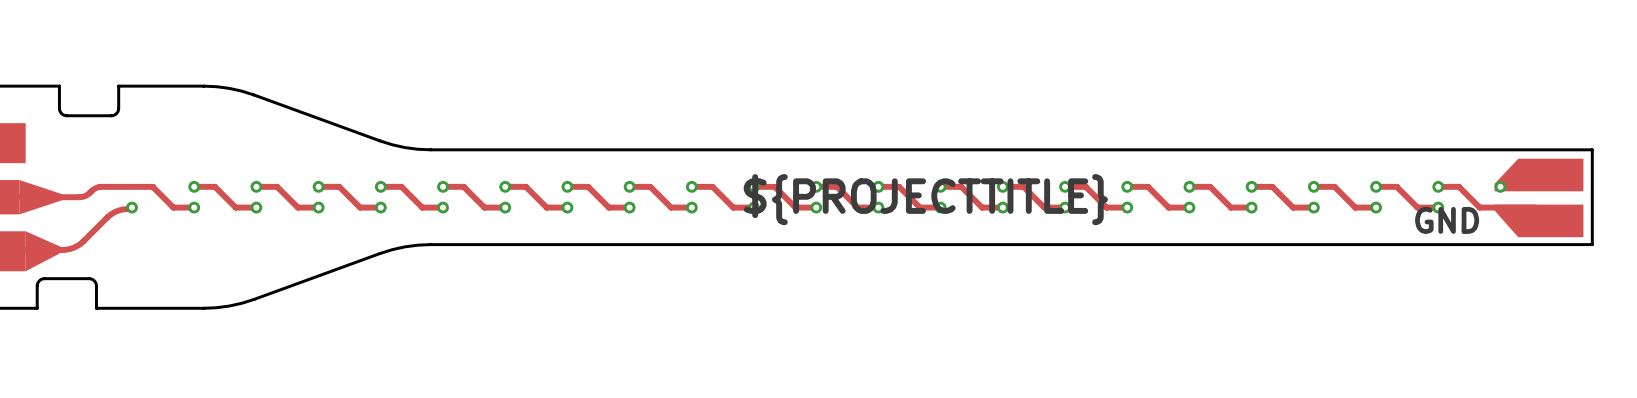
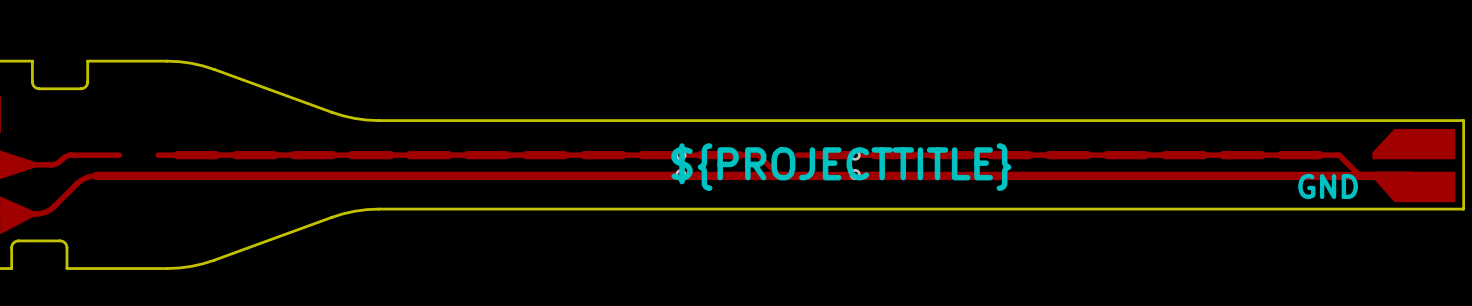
track: (152, 186) (173, 207) (194, 207) -> none
via: (194, 186) -> none
track: (214, 186) (235, 207) (256, 207) -> (177, 155) (216, 155)
via: (256, 186) -> none
track: (277, 186) (297, 207) (318, 207) -> (235, 155) (274, 155)
via: (318, 186) -> none
track: (339, 186) (360, 207) (380, 207) -> (293, 155) (332, 155)
via: (380, 186) -> none
track: (401, 186) (422, 207) (443, 207) -> (351, 155) (390, 155)
via: (443, 186) -> none
track: (463, 186) (484, 207) (505, 207) -> (409, 155) (448, 155)
via: (505, 186) -> none
track: (525, 186) (546, 207) (567, 207) -> (467, 155) (506, 155)
via: (567, 186) -> none
track: (588, 186) (608, 207) (629, 207) -> (526, 155) (564, 155)
via: (629, 186) -> none
track: (650, 186) (671, 207) (691, 207) -> (584, 155) (622, 155)
via: (691, 186) -> none
track: (712, 186) (733, 207) (754, 207) -> (642, 155) (680, 155)
track: (774, 186) (795, 207) (816, 207) -> (700, 155) (739, 155)
via: (816, 186) -> none
via: (878, 186) -> none
track: (899, 186) (919, 207) (940, 207) -> (816, 155) (855, 155)
track: (961, 186) (982, 207) (1002, 207) -> (874, 155) (913, 155)
via: (1002, 186) -> none
track: (1023, 186) (1044, 207) (1065, 207) -> (932, 155) (971, 155)
via: (1065, 186) -> none
track: (1085, 186) (1106, 207) (1127, 207) -> (990, 155) (1029, 155)
via: (1127, 186) -> none
track: (1147, 186) (1168, 207) (1189, 207) -> (1048, 155) (1087, 155)
via: (1189, 186) -> none
track: (1210, 186) (1230, 207) (1251, 207) -> (1106, 155) (1145, 155)
via: (1251, 186) -> none
track: (1272, 186) (1293, 207) (1313, 207) -> (1164, 155) (1203, 155)
via: (1313, 186) -> none
track: (1334, 186) (1355, 207) (1376, 207) -> (1223, 155) (1261, 155)
via: (1376, 186) -> none
track: (1396, 186) (1417, 207) (1438, 207) -> (1281, 155) (1319, 155)
via: (1438, 186) -> none
via: (1500, 186) -> none
via: (132, 207) -> none
via: (194, 207) -> none
via: (256, 207) -> none
via: (318, 207) -> none
via: (380, 207) -> none
via: (443, 207) -> none
via: (505, 207) -> none
via: (567, 207) -> none
via: (629, 207) -> none
via: (691, 207) -> none
via: (816, 207) -> none
via: (878, 207) -> none
via: (1002, 207) -> none
via: (1065, 207) -> none
via: (1127, 207) -> none
via: (1189, 207) -> none
via: (1251, 207) -> none
via: (1313, 207) -> none
via: (1376, 207) -> none
via: (1438, 207) -> none
track: none -> (1411, 174) (1422, 185) (1412, 175) (96, 175)

